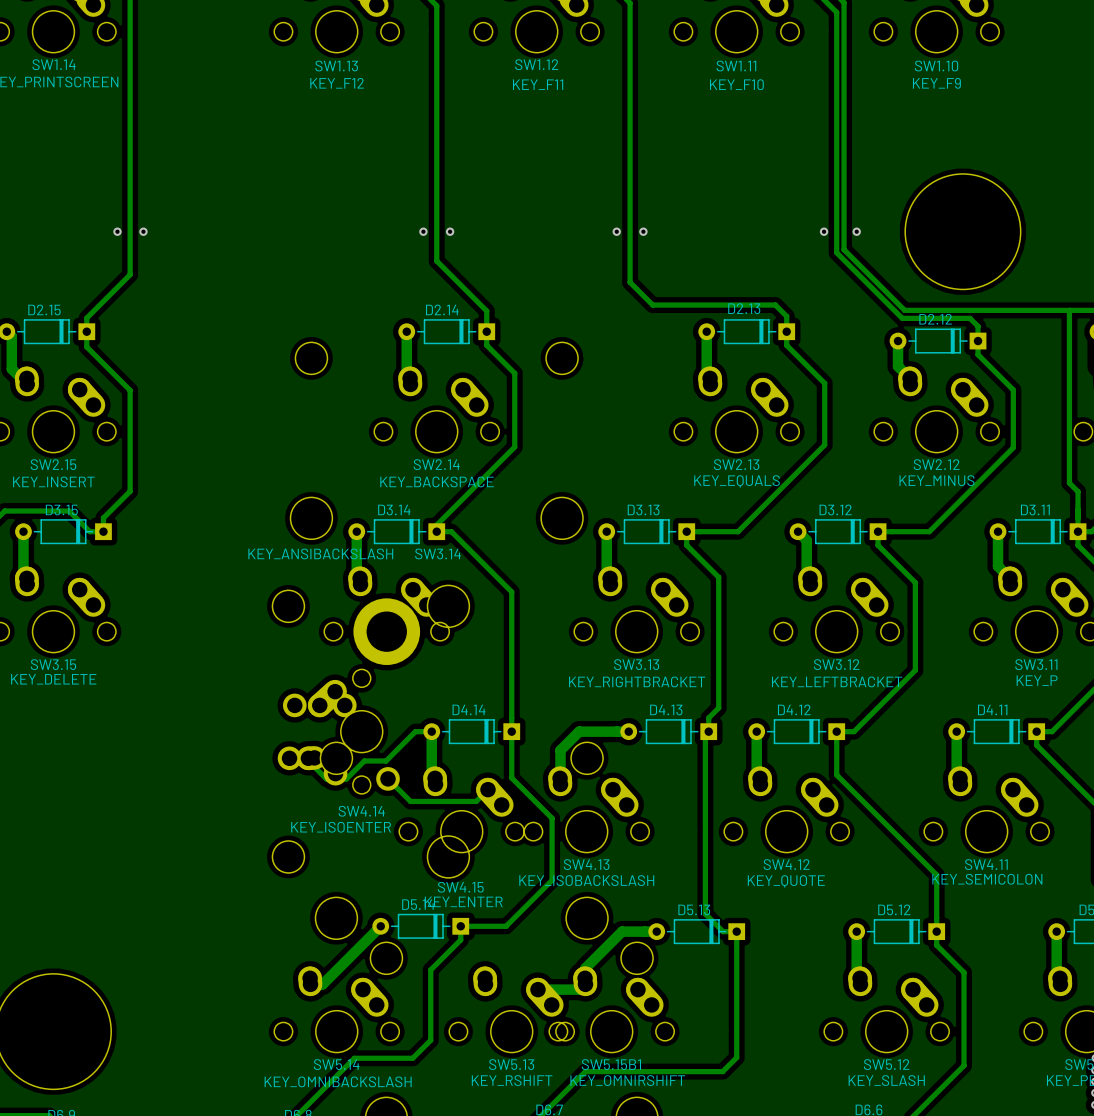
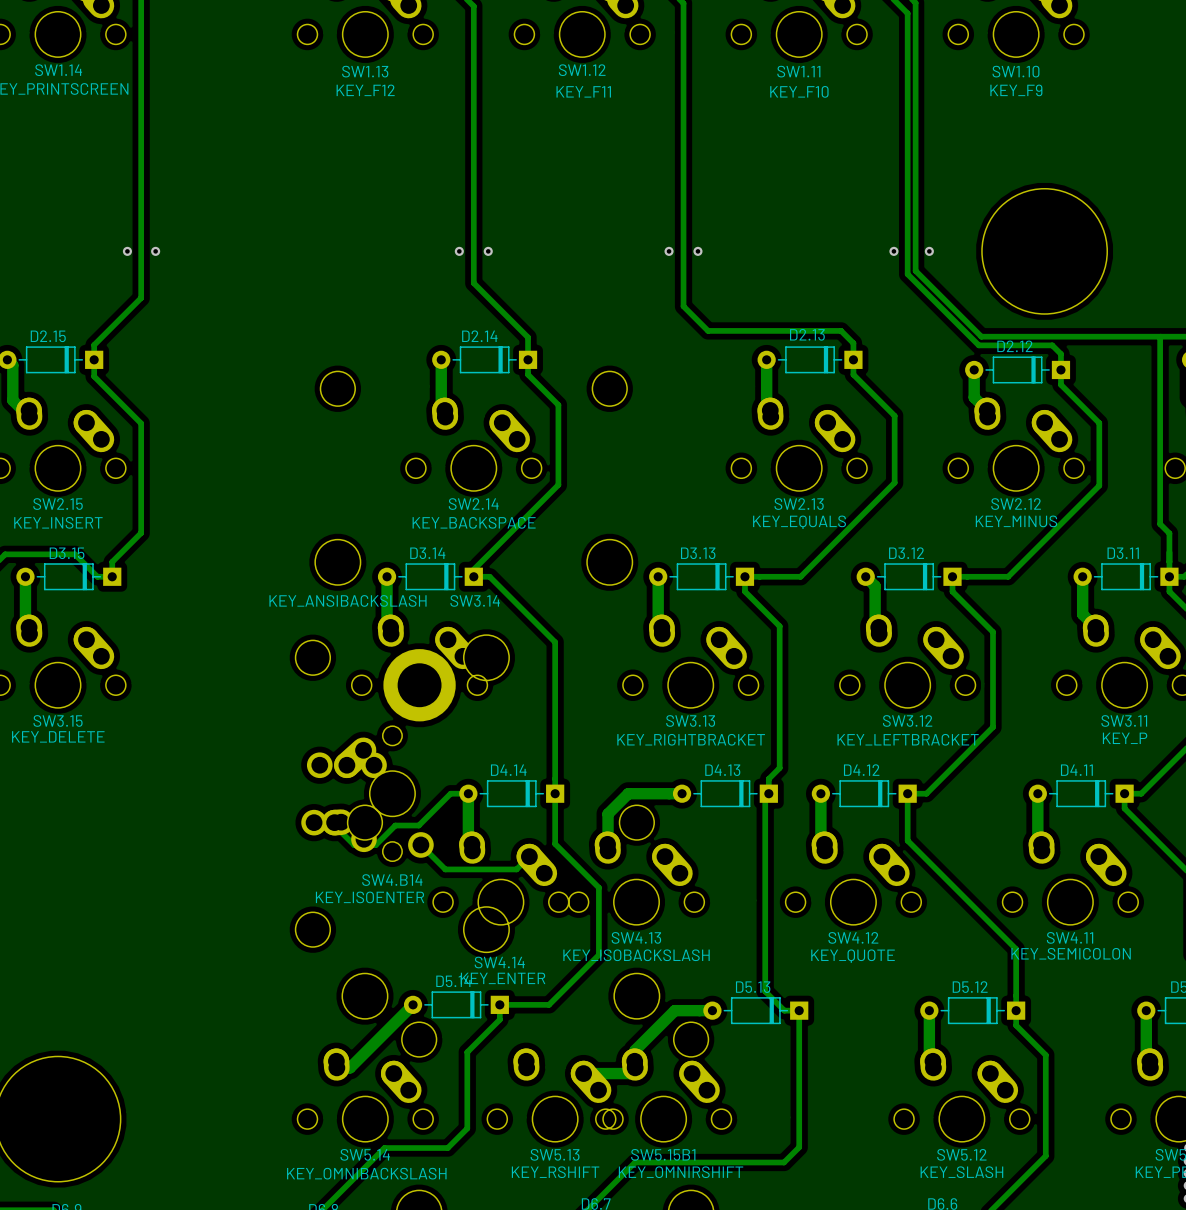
SW4.14 name: SW4.14 (361, 811) -> SW4.B14 (392, 880)
SW4.15 name: SW4.15 (460, 887) -> SW4.14 (499, 962)

